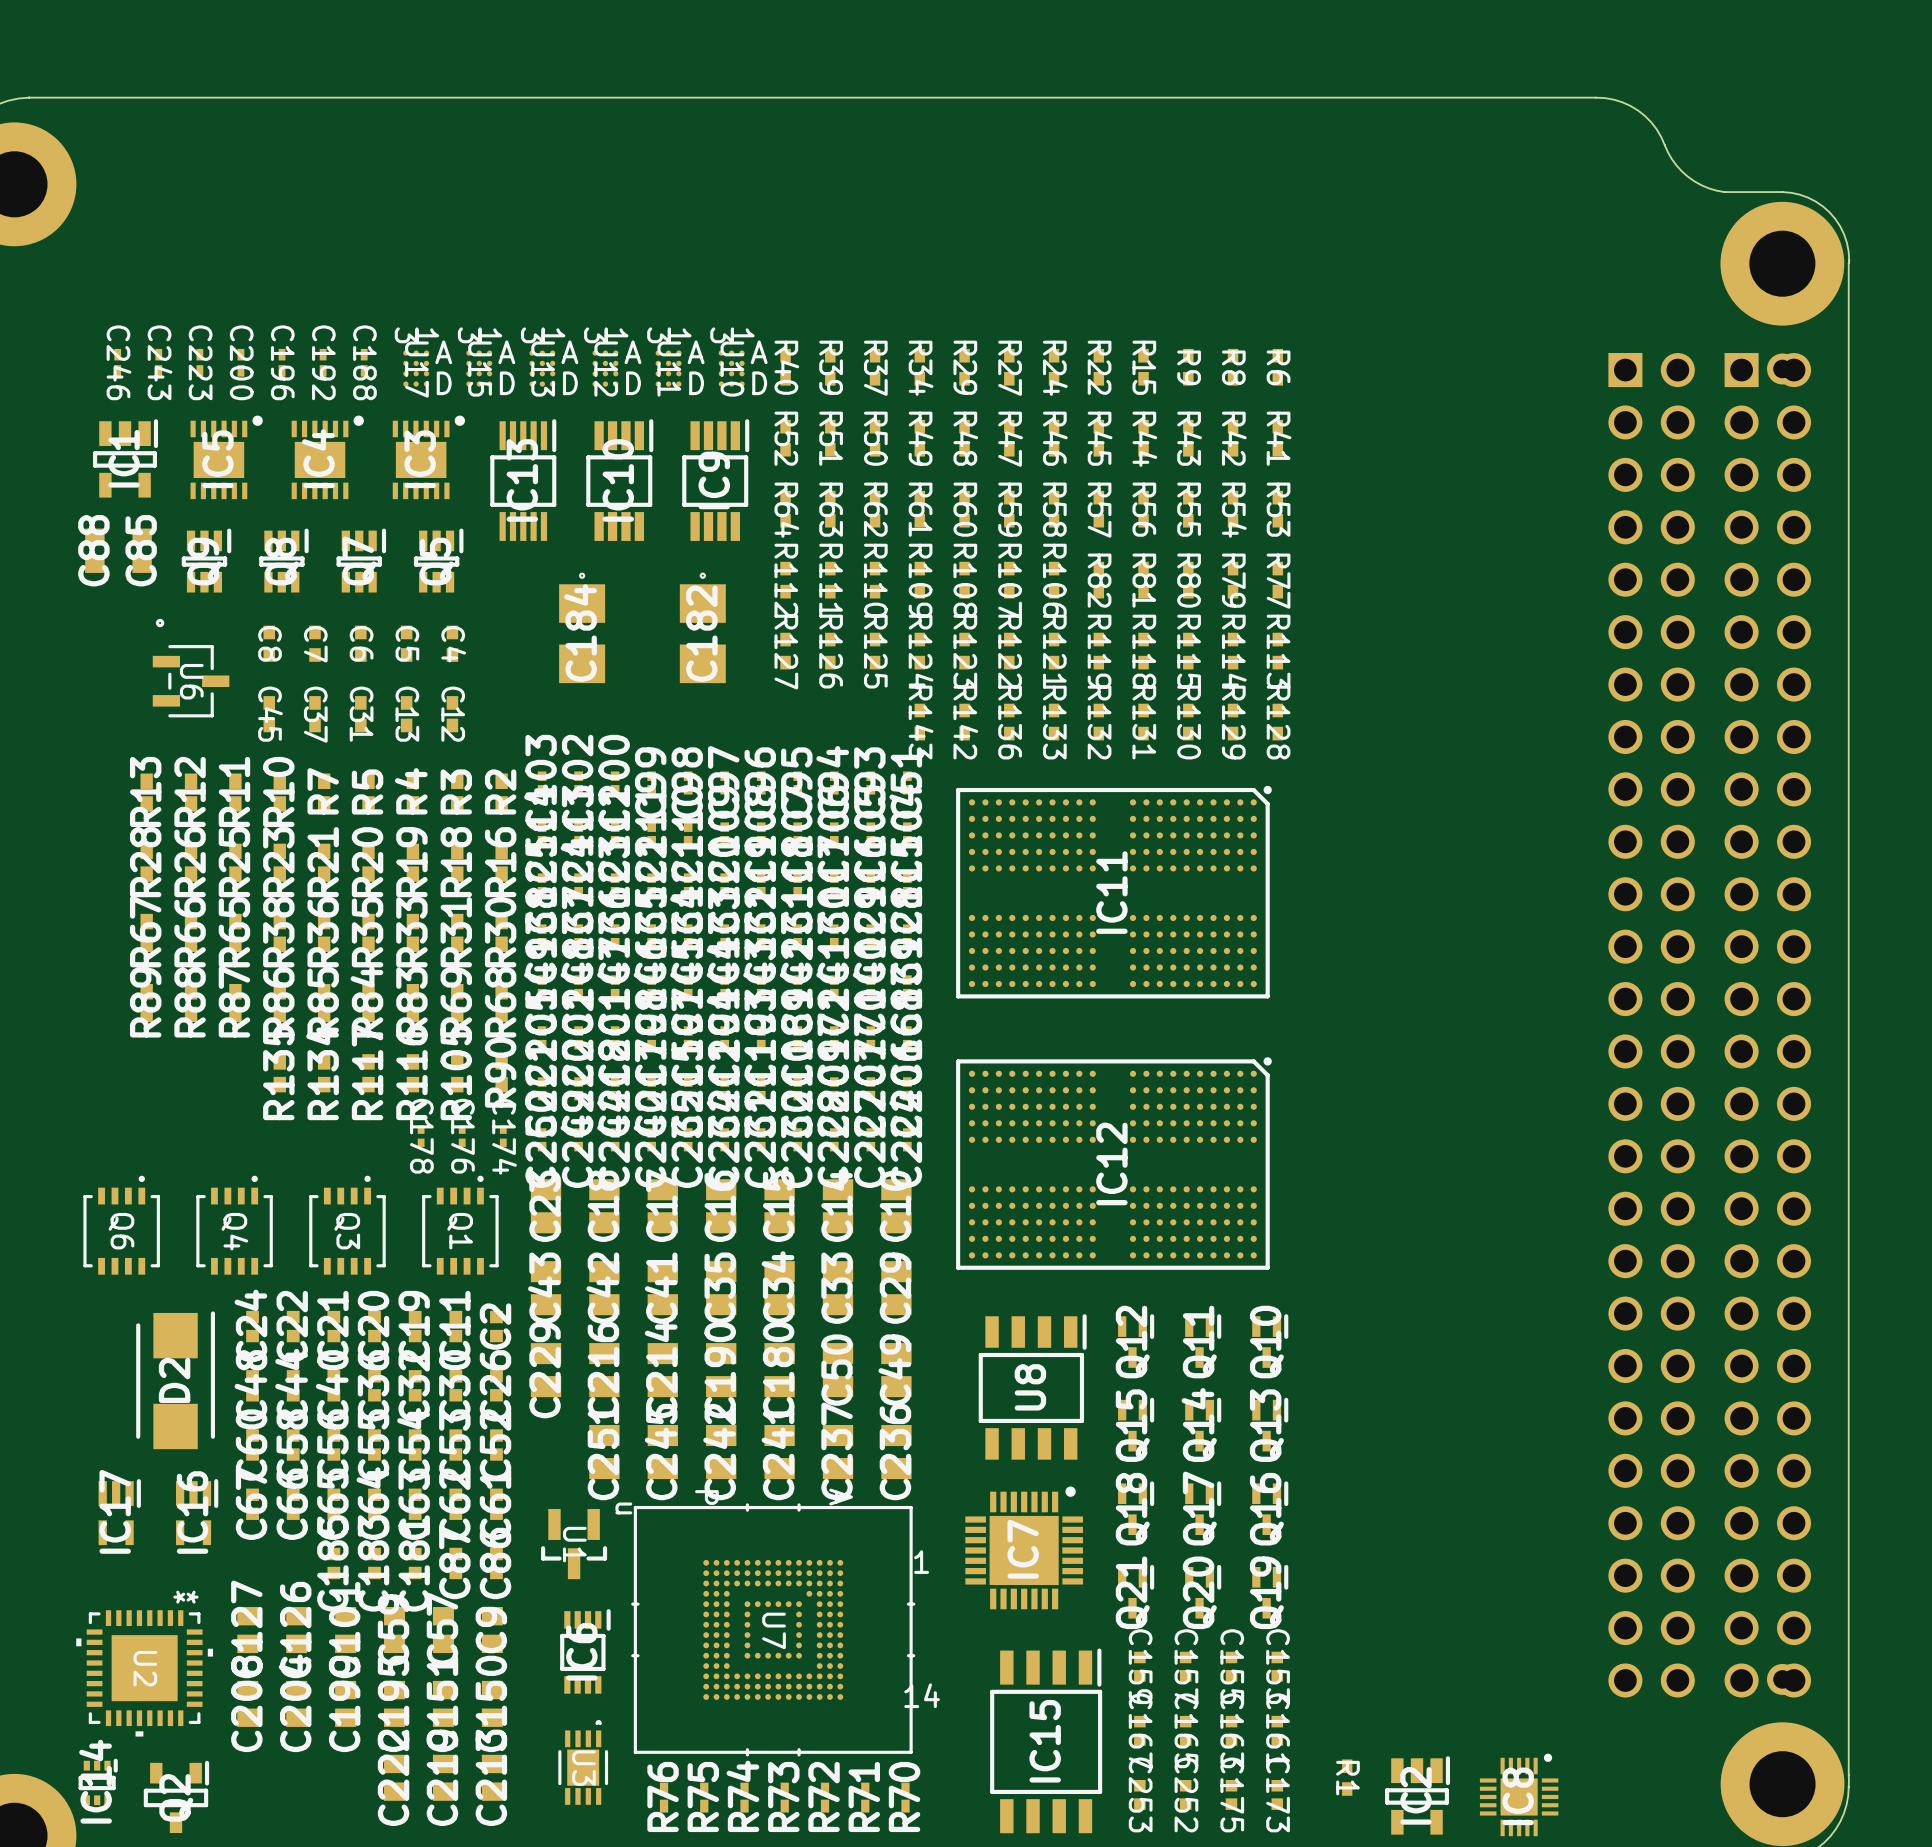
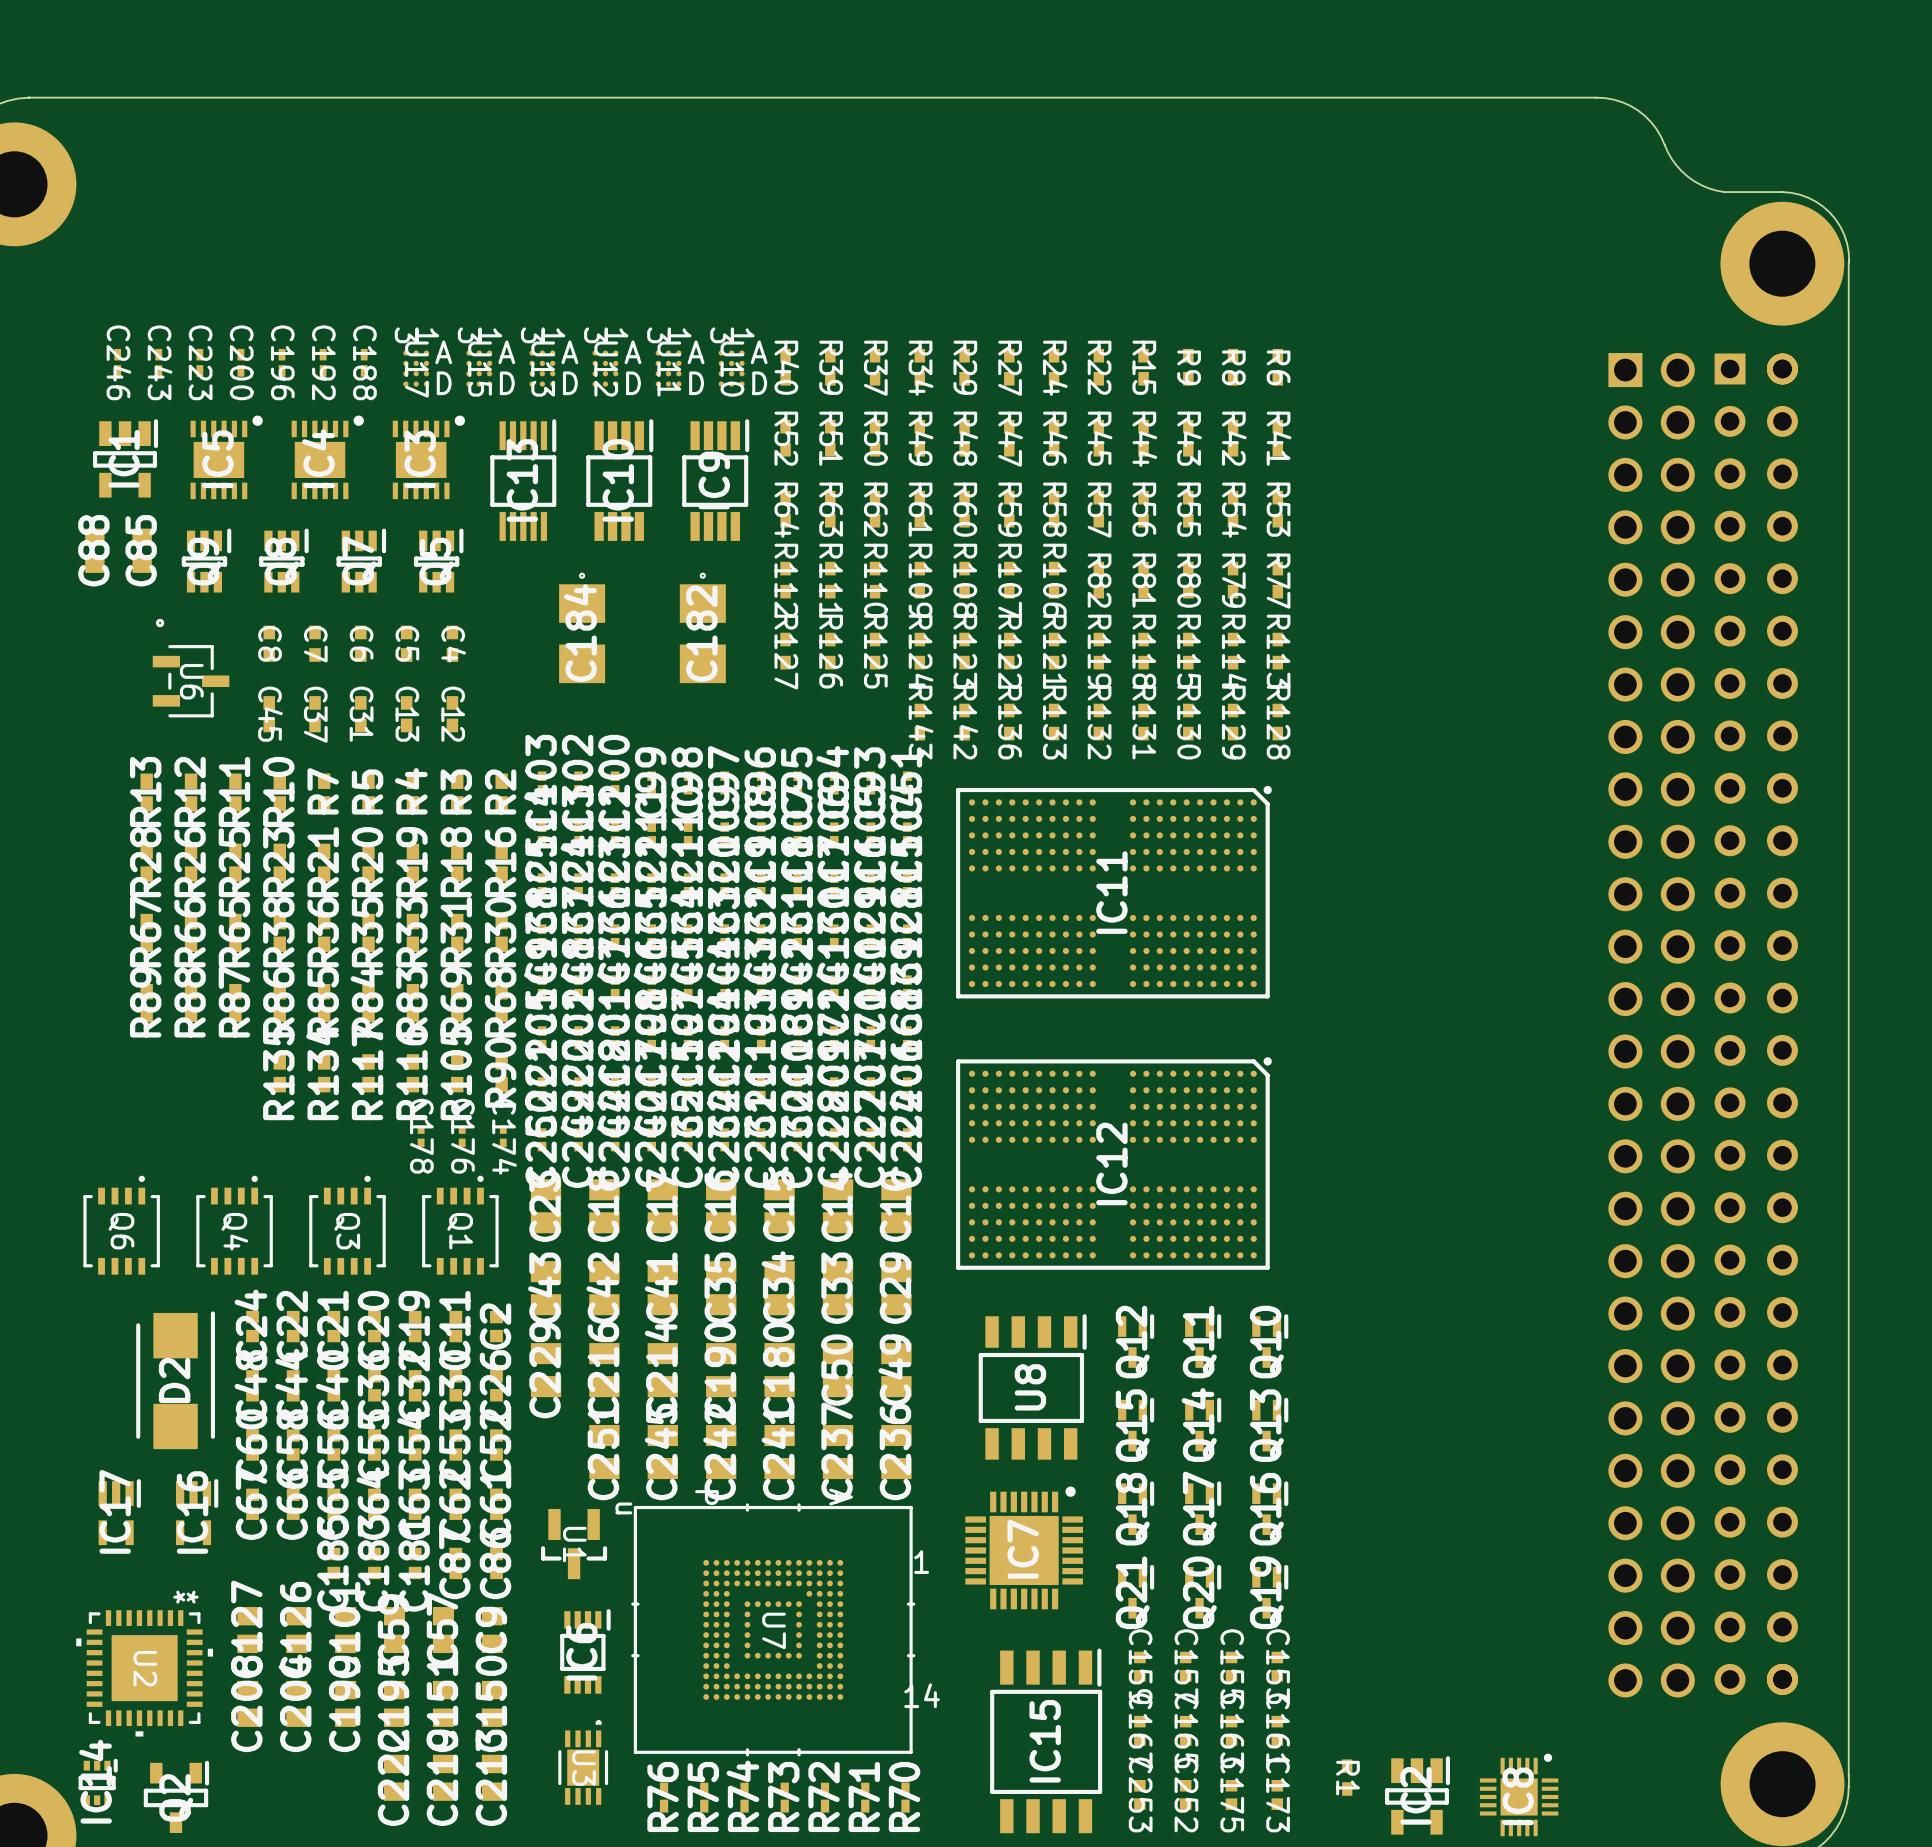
part footprint: [1724, 353, 1812, 1698] -> [1714, 353, 1798, 1695]

